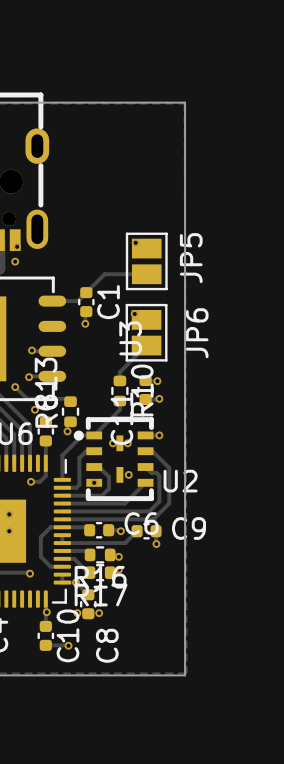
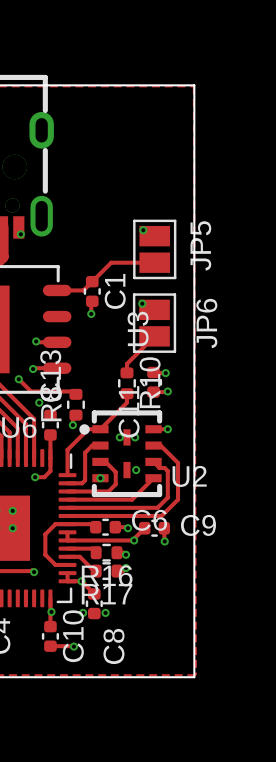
via: (15, 261) -> none
via: none -> (134, 540)

